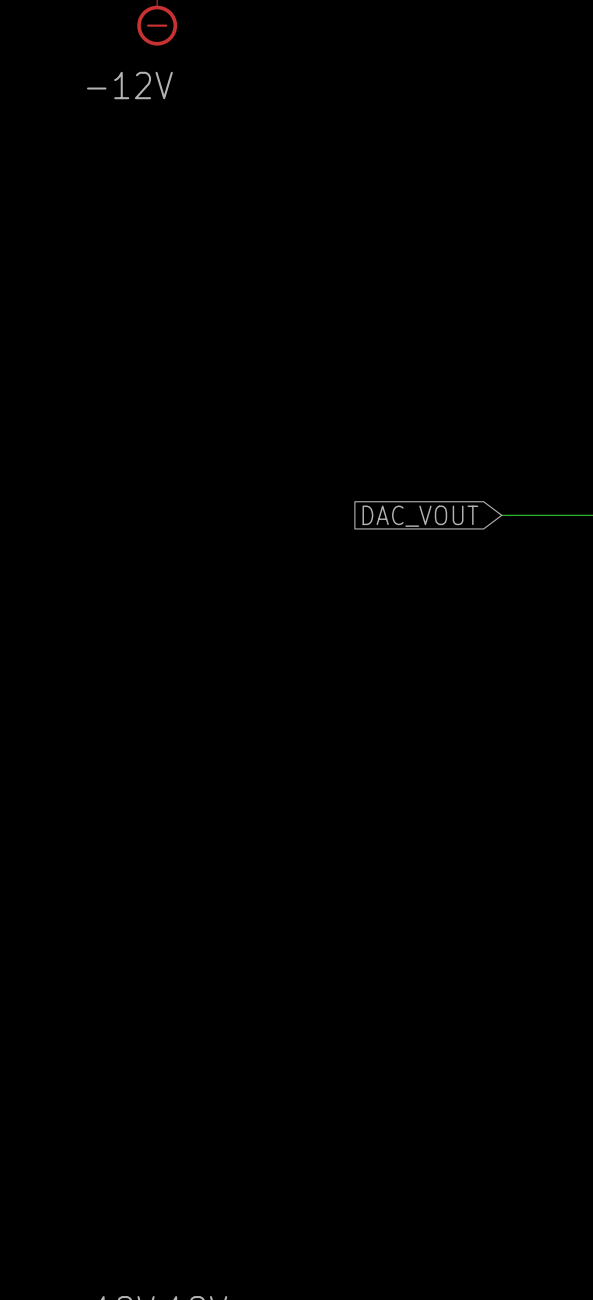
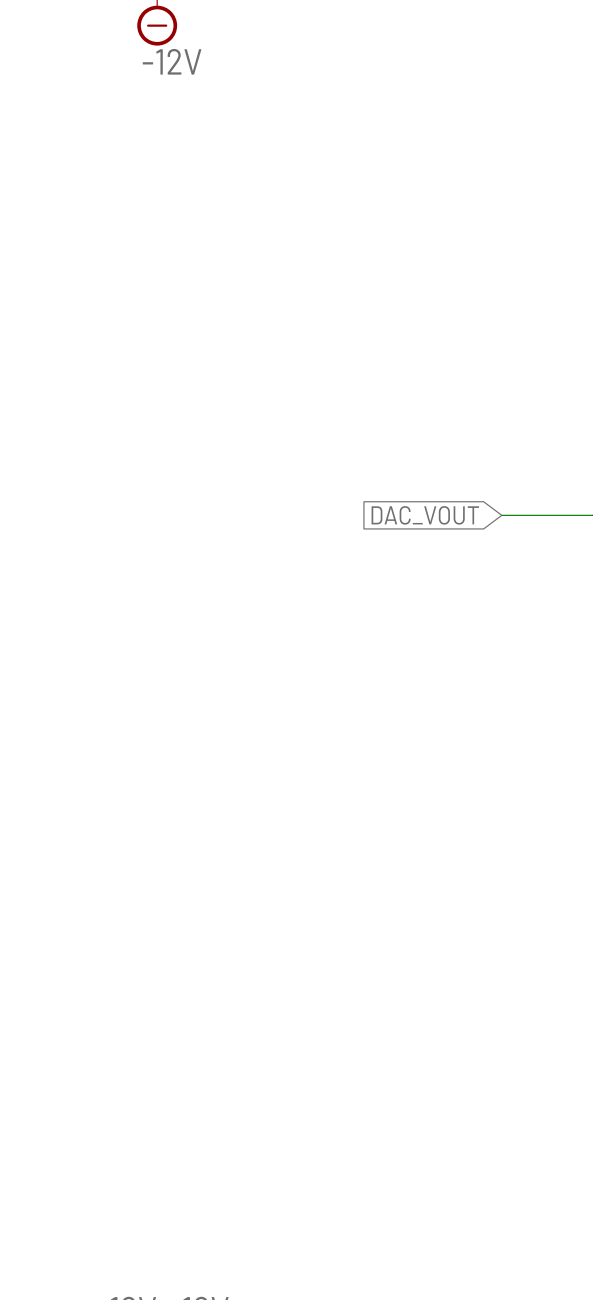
power symbol text position: -12V (129, 85) -> -12V (172, 61)

